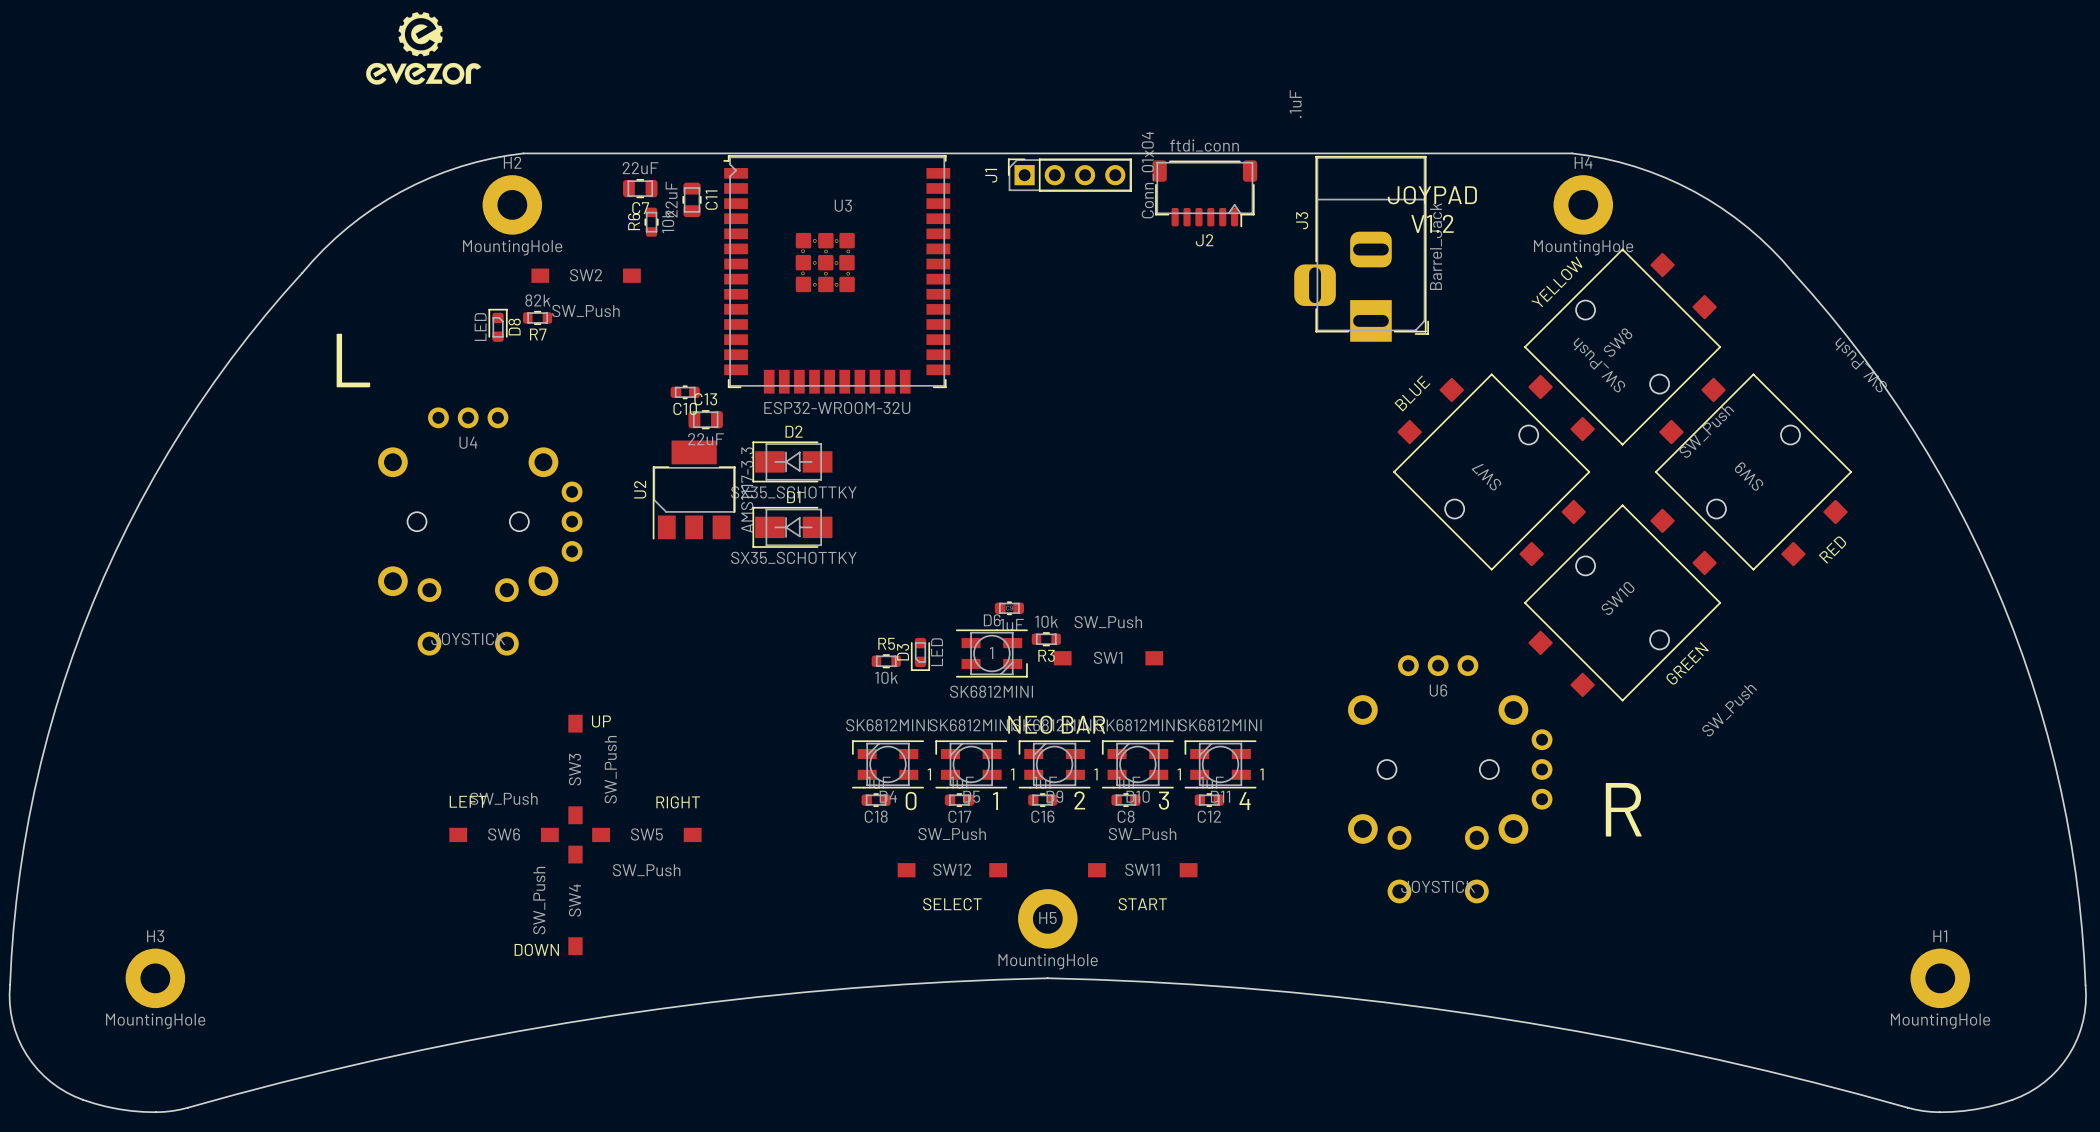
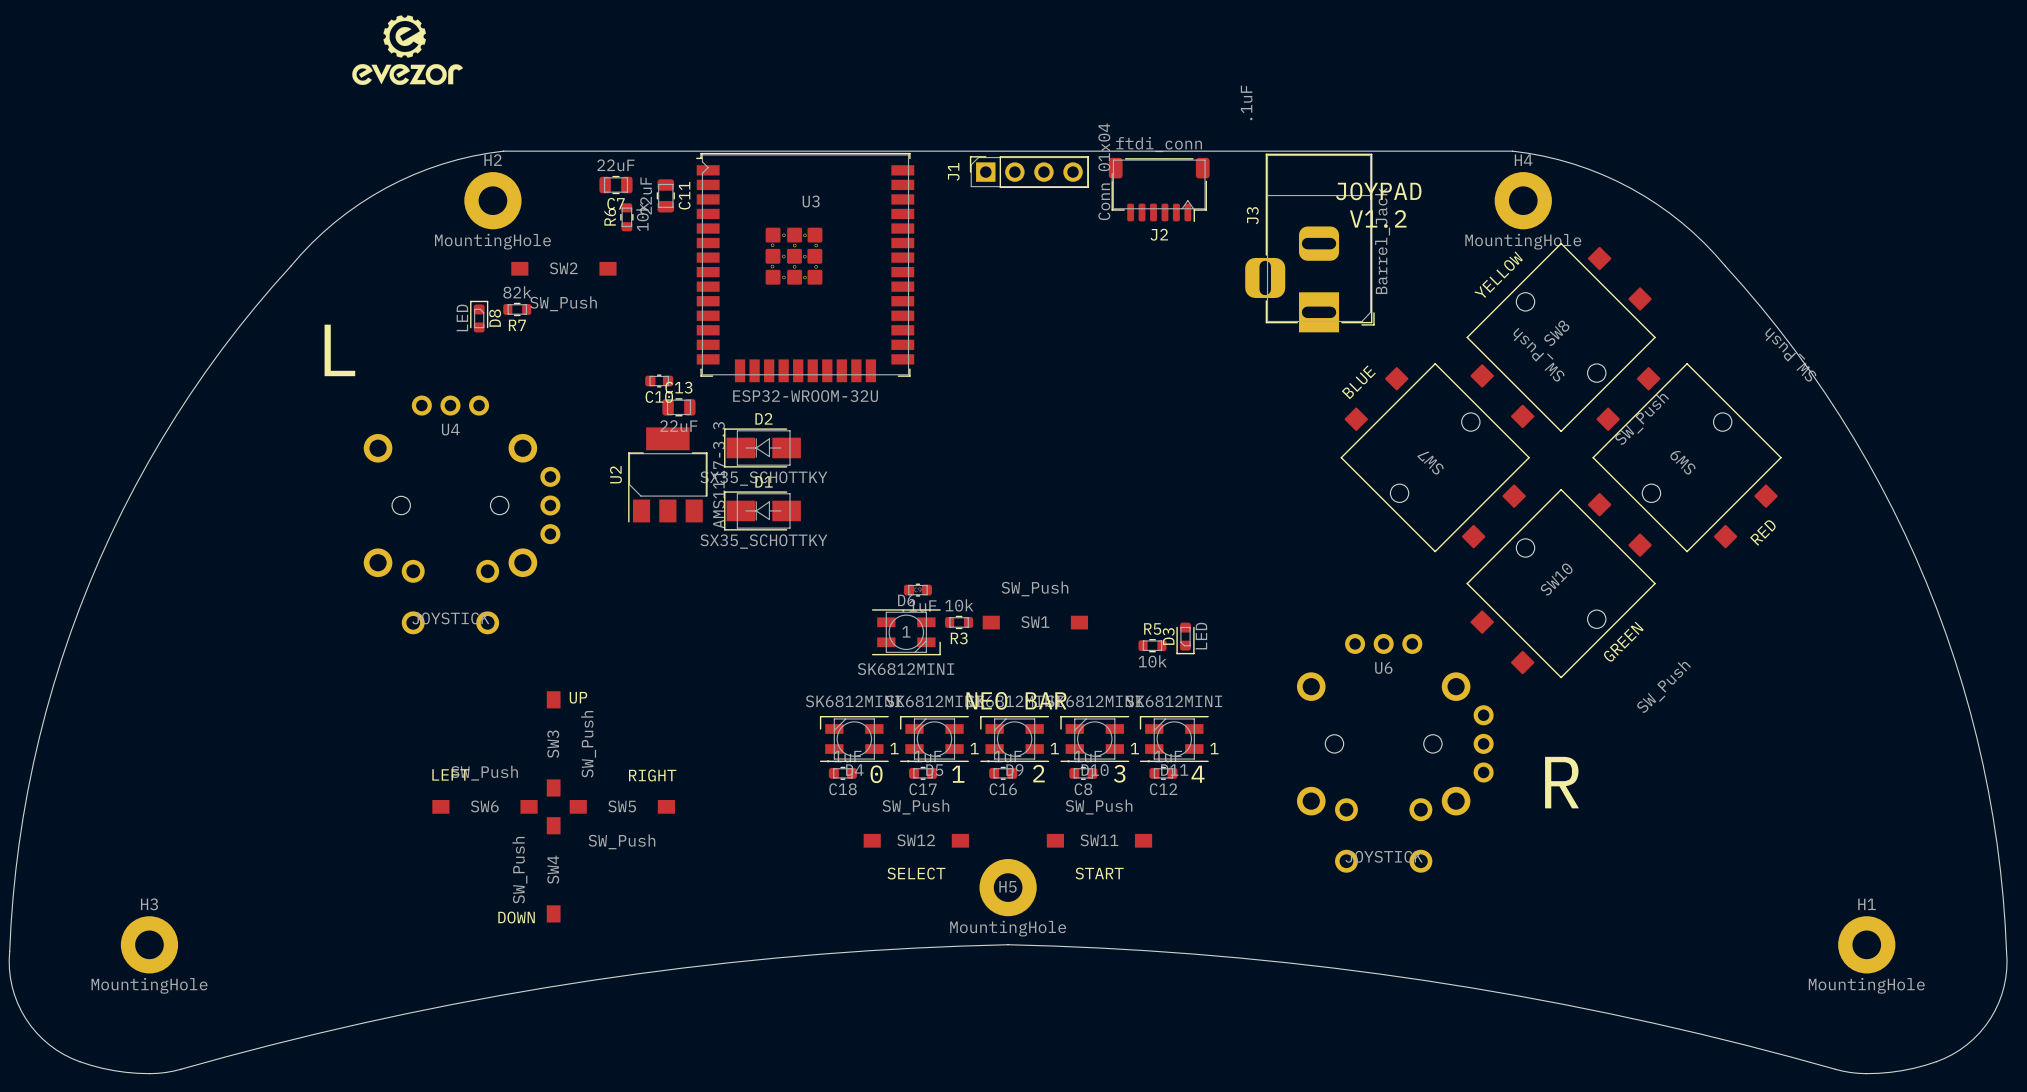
part position: (1009, 608) -> (917, 590)
R3 position: (1046, 639) -> (959, 622)
D6 position: (991, 653) -> (906, 632)
D3 position: (920, 654) -> (1185, 638)
SW1 position: (1108, 658) -> (1035, 622)
R5 position: (886, 661) -> (1152, 645)

